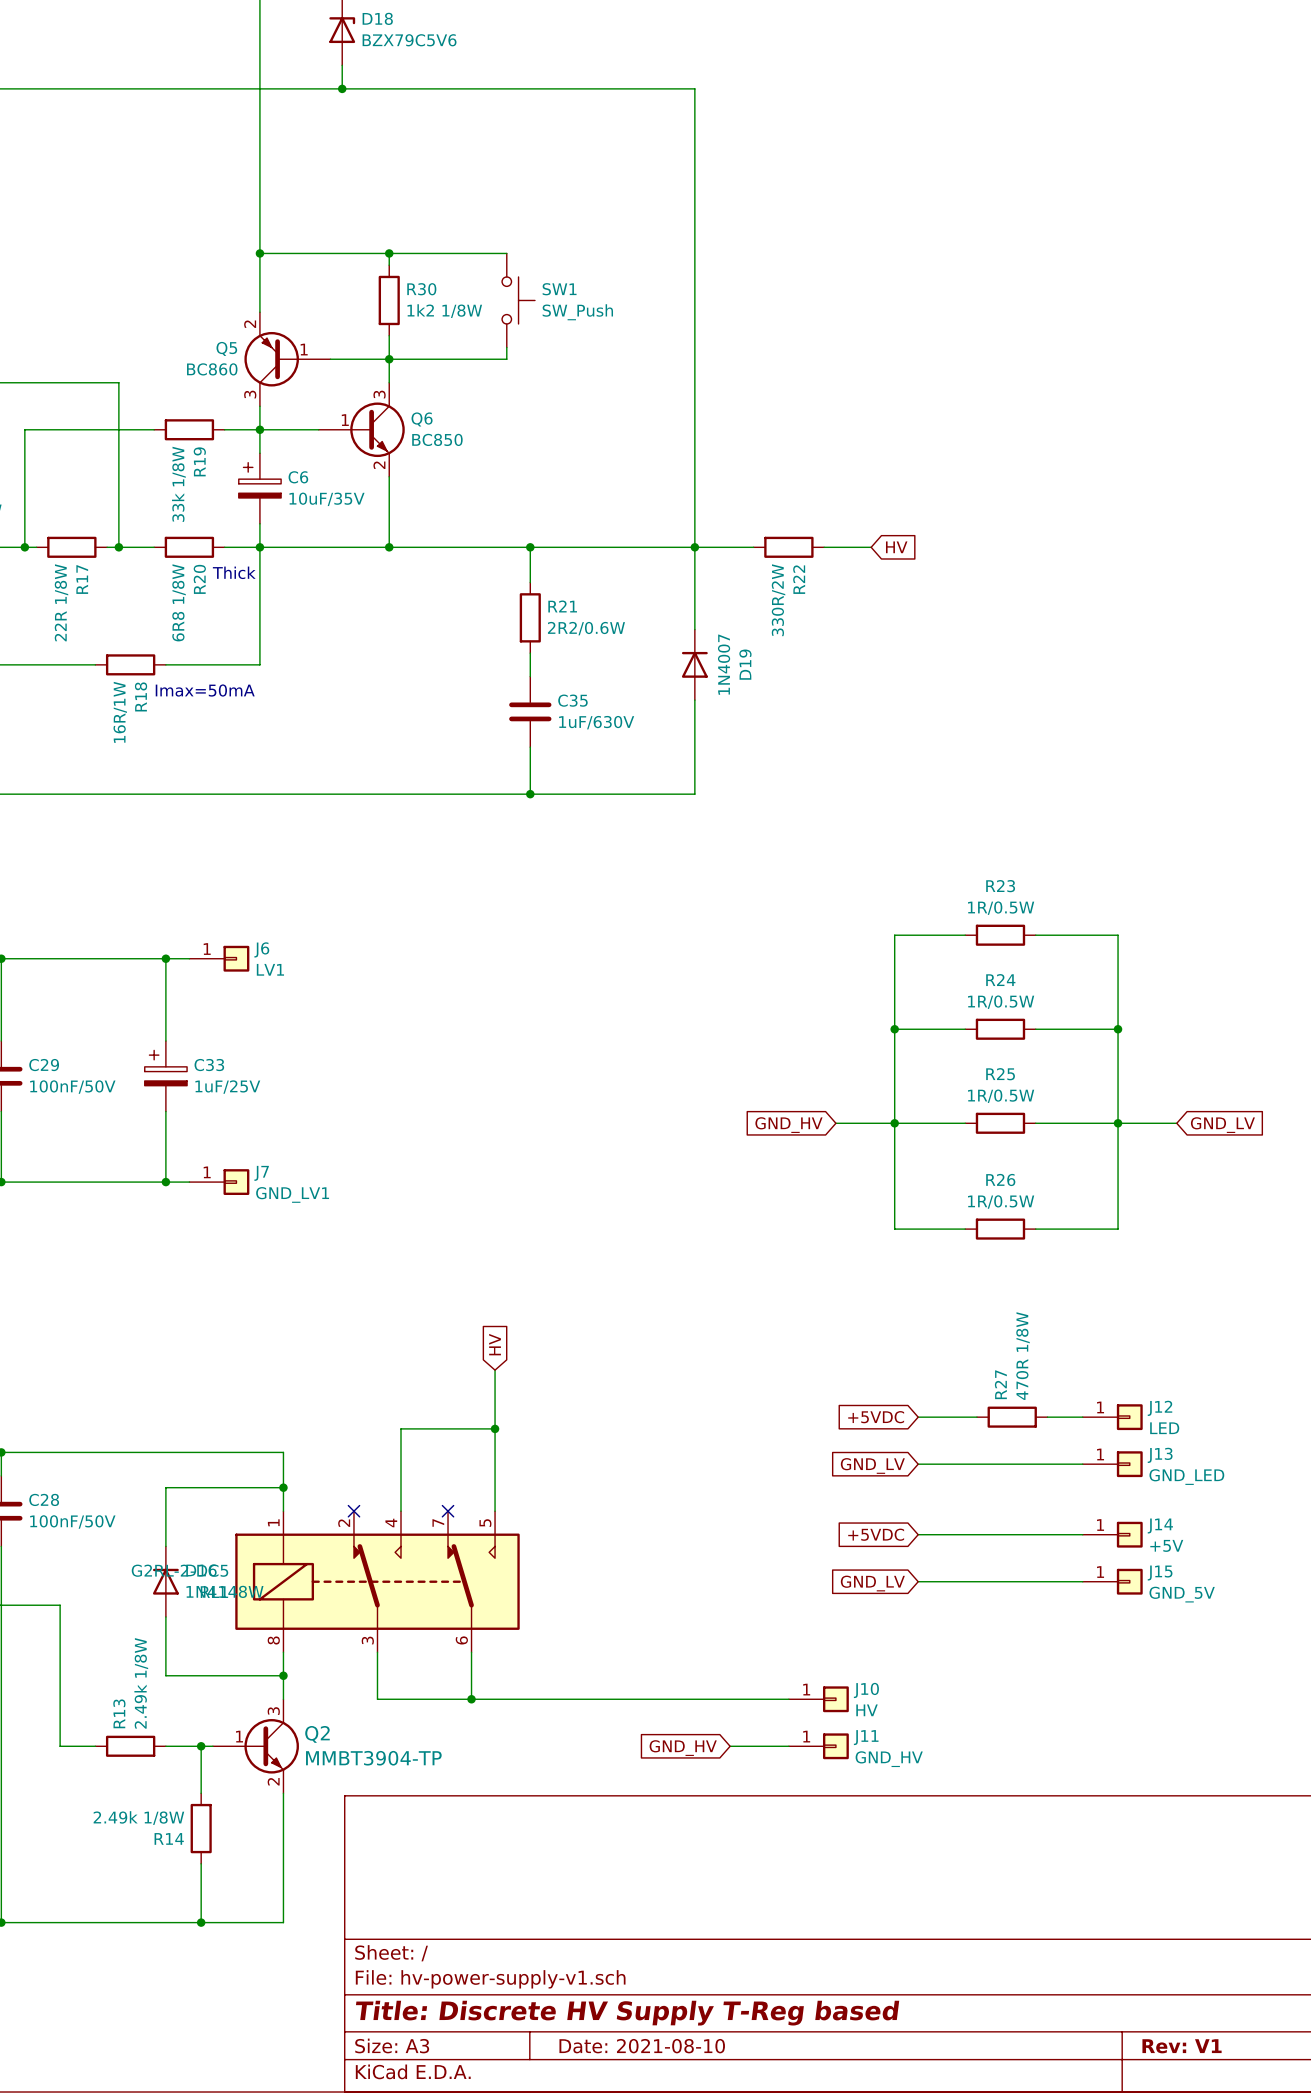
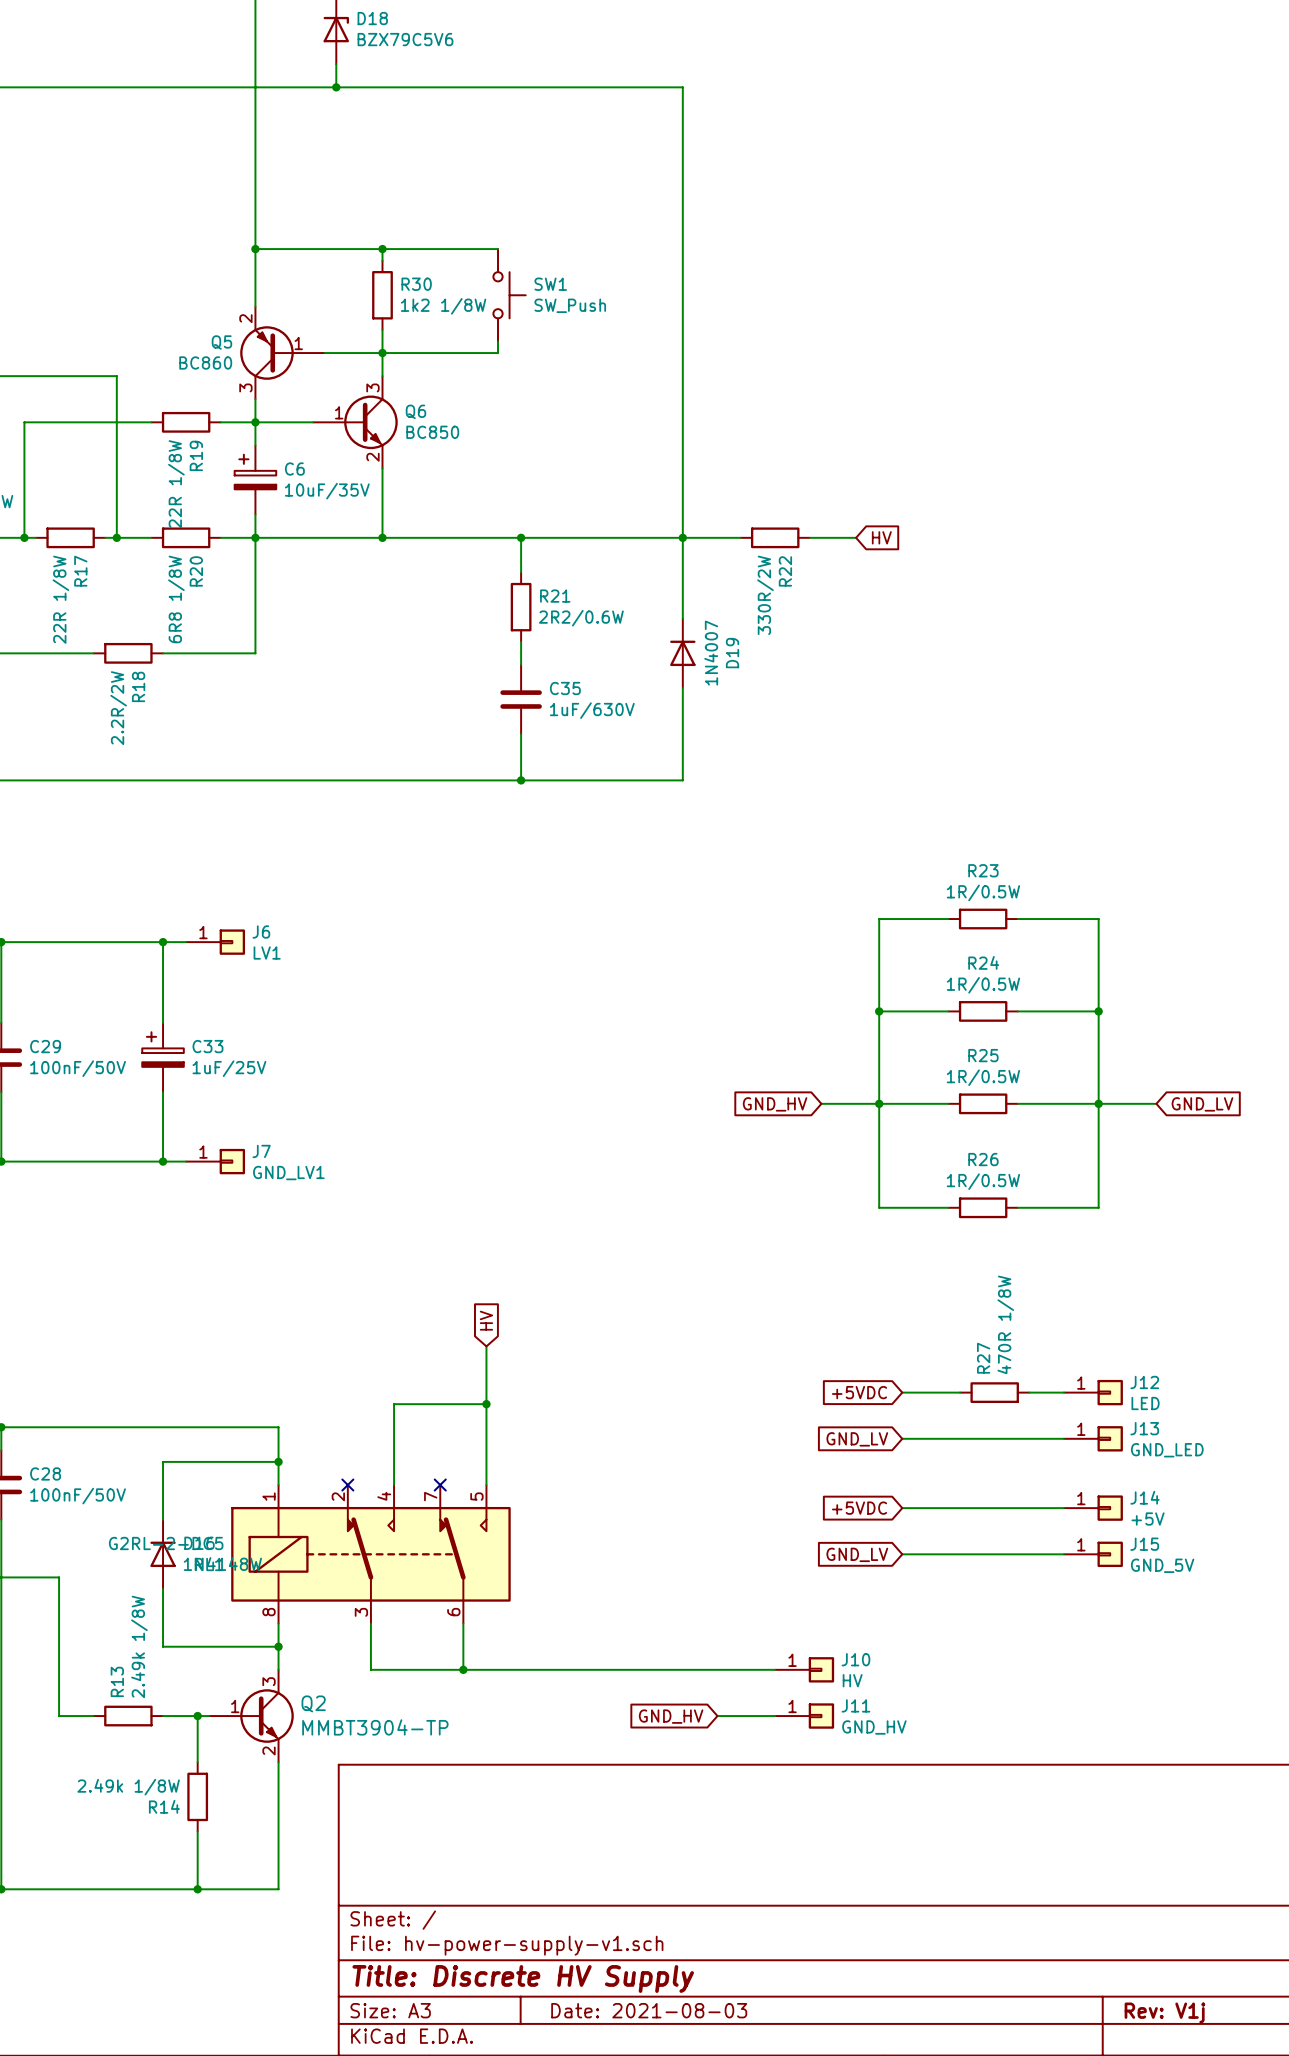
R19 value: 33k 1/8W (178, 484) -> 22R 1/8W (176, 484)
text: Thick (234, 572) -> none
text: Imax=50mA (205, 690) -> none
R18 value: 16R/1W (120, 712) -> 2.2R/2W (118, 708)
title block: Title: Discrete HV Supply T-Reg based (627, 2013) -> Title: Discrete HV Supply (523, 1978)
title block: Date: 2021-08-10 (642, 2046) -> Date: 2021-08-03 (649, 2010)
title block: Rev: V1 (1182, 2046) -> Rev: V1j (1164, 2012)

